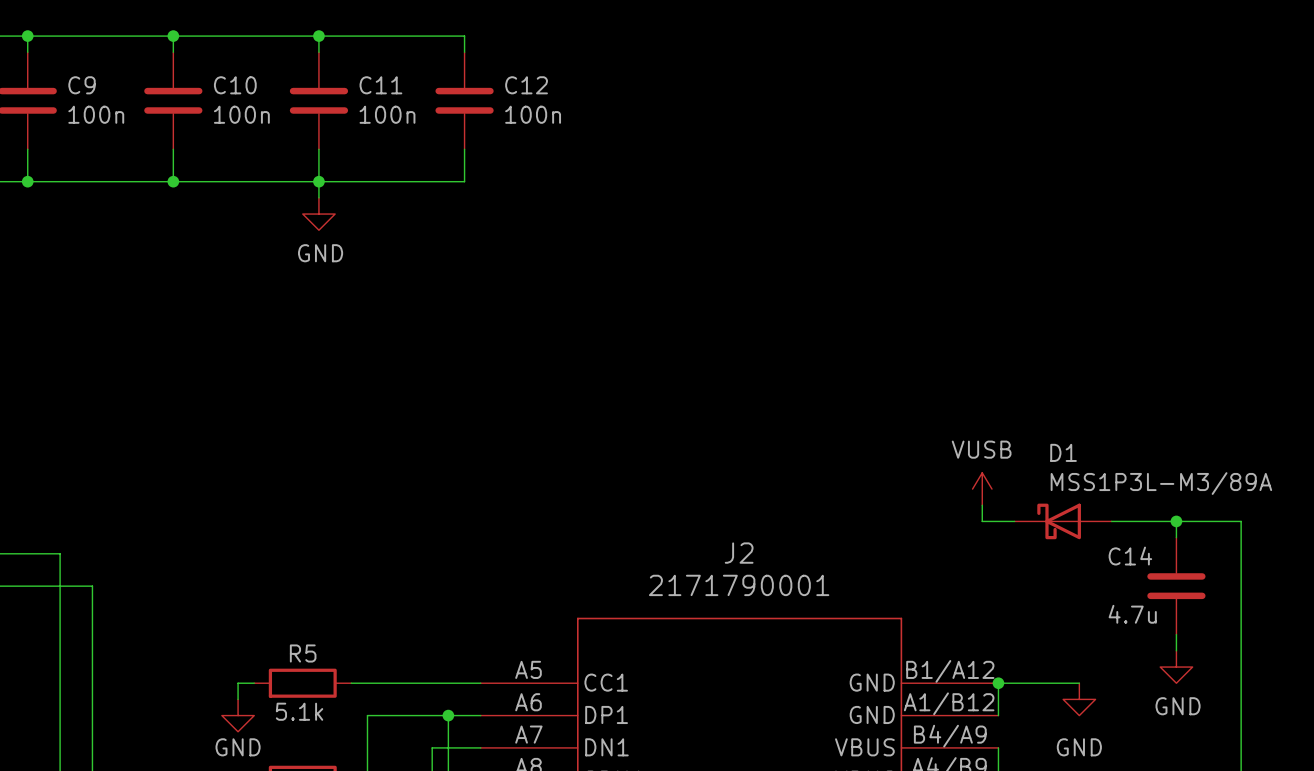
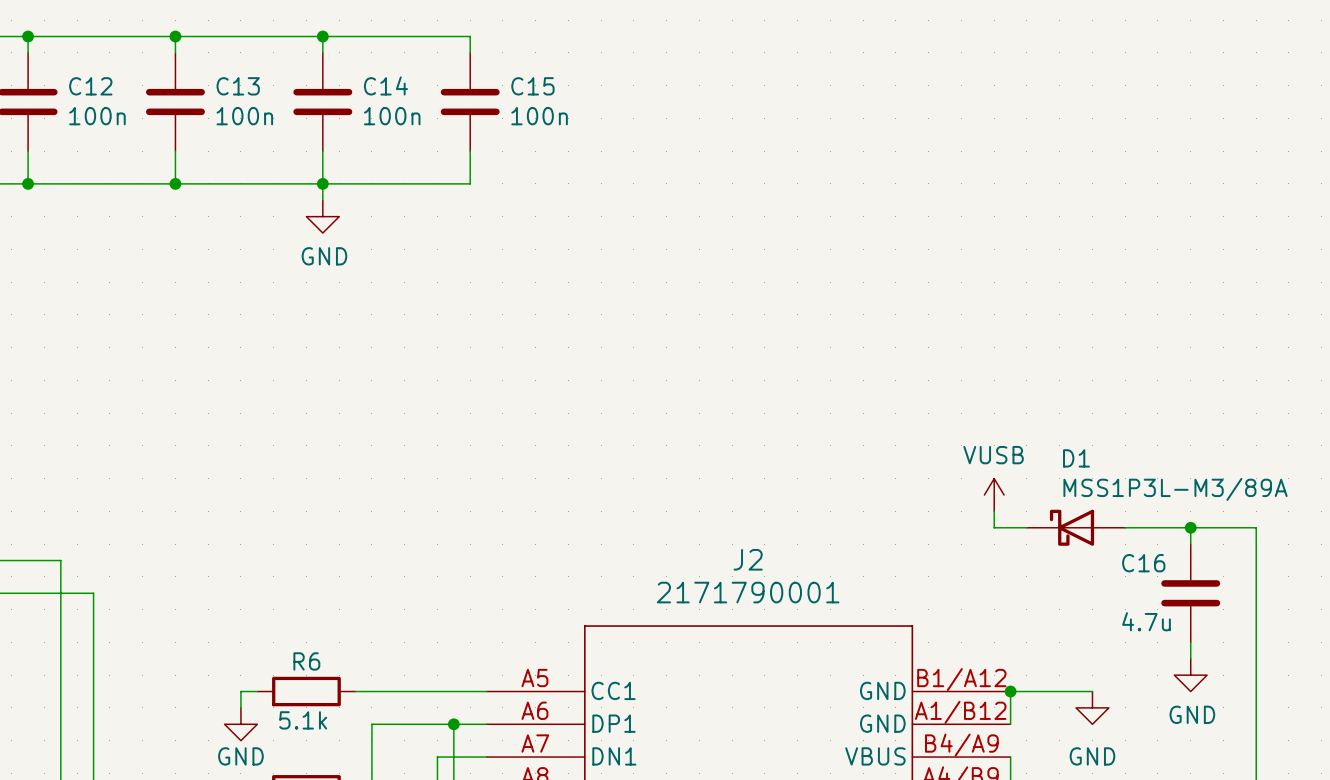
C9 name: C9 (82, 85) -> C12 (90, 86)
C10 name: C10 (235, 85) -> C13 (238, 86)
C11 name: C11 (380, 85) -> C14 (385, 85)
C12 name: C12 (526, 85) -> C15 (532, 86)
C14 name: C14 (1130, 556) -> C16 (1143, 563)
R5 name: R5 (303, 653) -> R6 (306, 661)

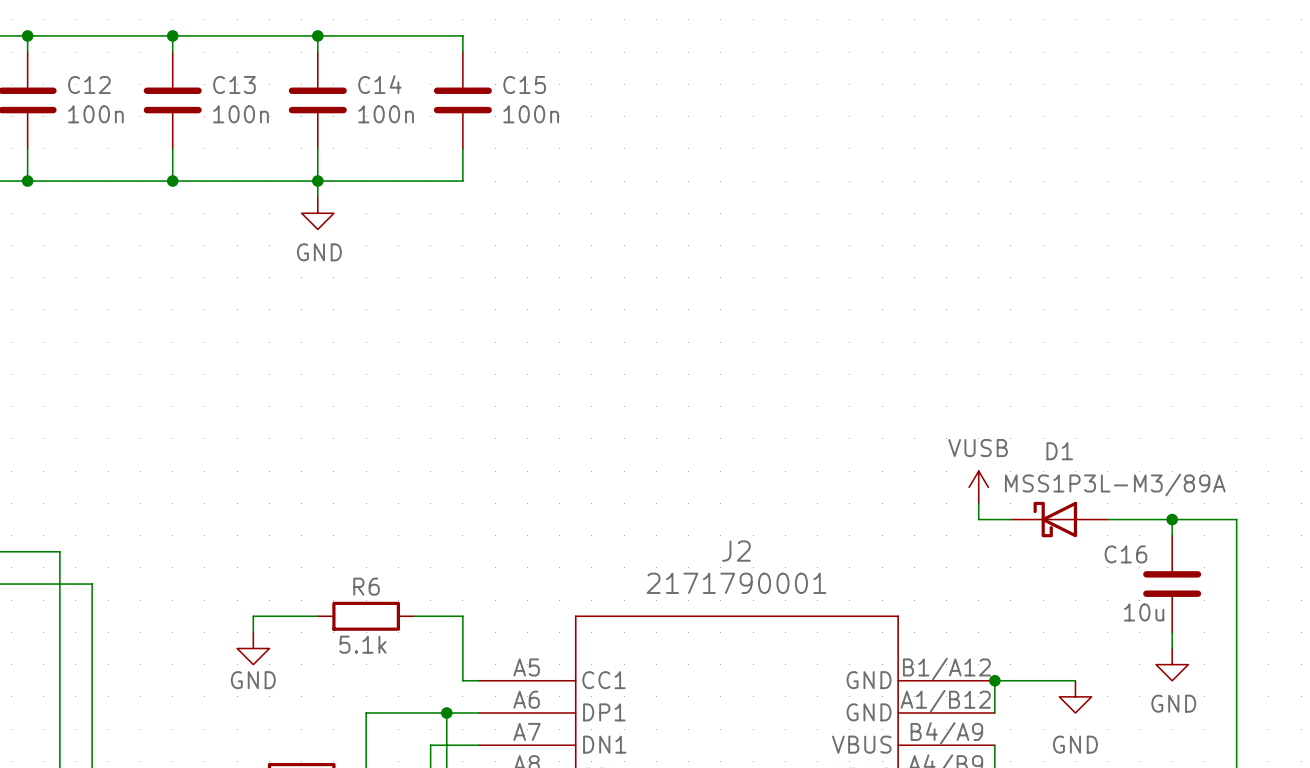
D1 value position: MSS1P3L-M3/89A (1175, 489) -> MSS1P3L-M3/89A (1115, 485)
C16 value: 4.7u (1146, 621) -> 10u (1144, 612)
wire: none -> (317, 616) (253, 616) (253, 632)
wire: (257, 691) (240, 691) (240, 707) -> none
R6 position: (306, 691) -> (366, 616)
wire: (355, 691) (470, 691) -> (414, 616) (462, 616) (462, 680)
power symbol position: GND (240, 724) -> GND (253, 648)

